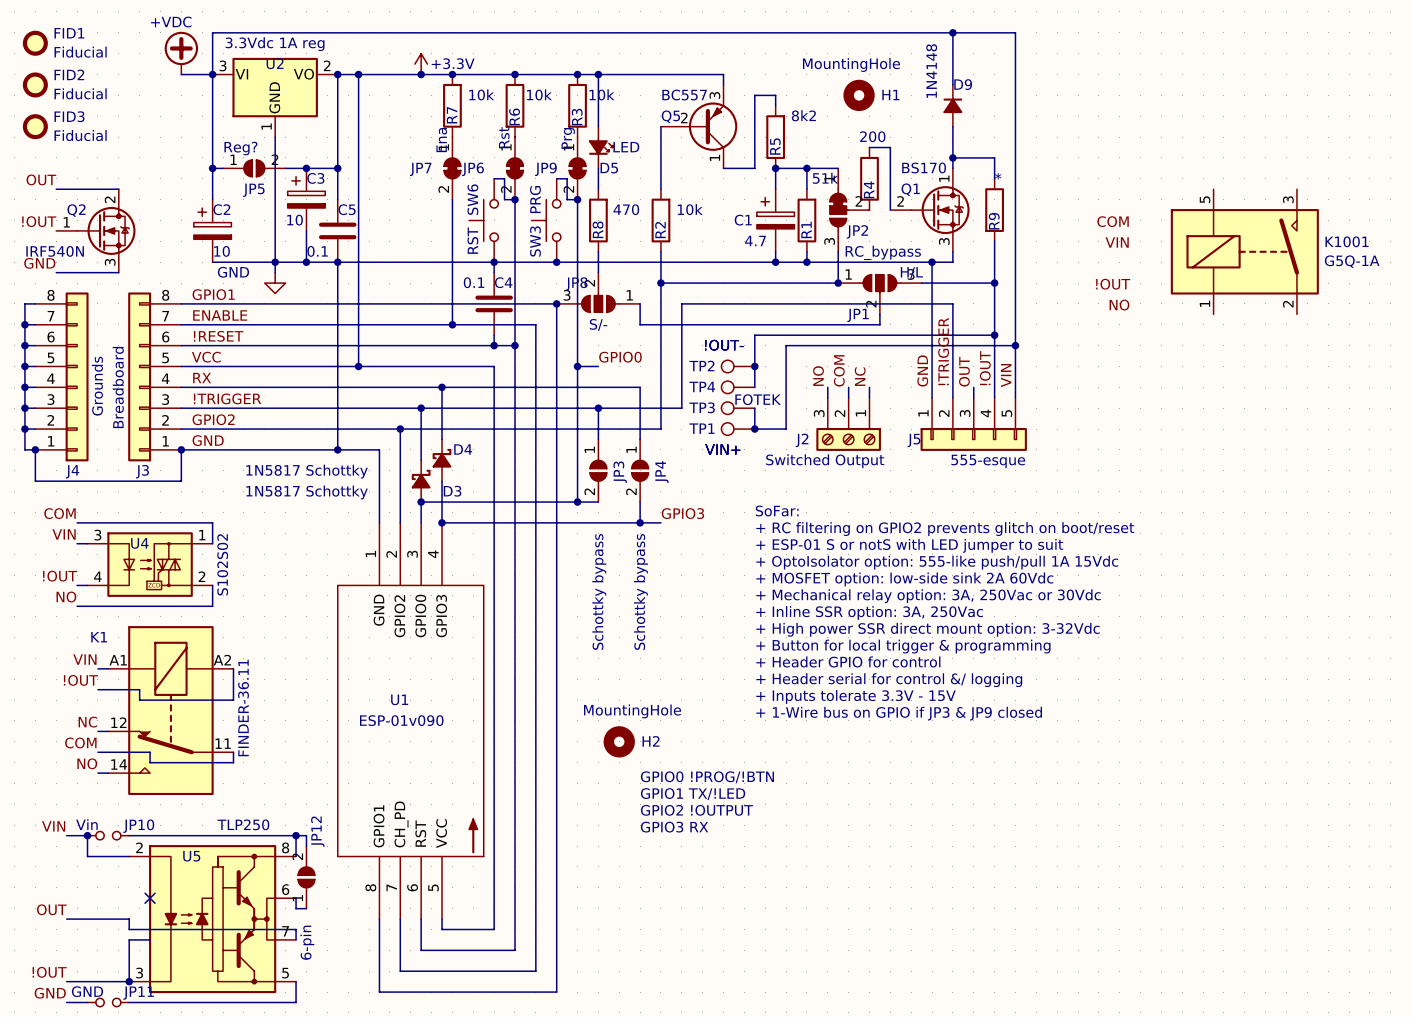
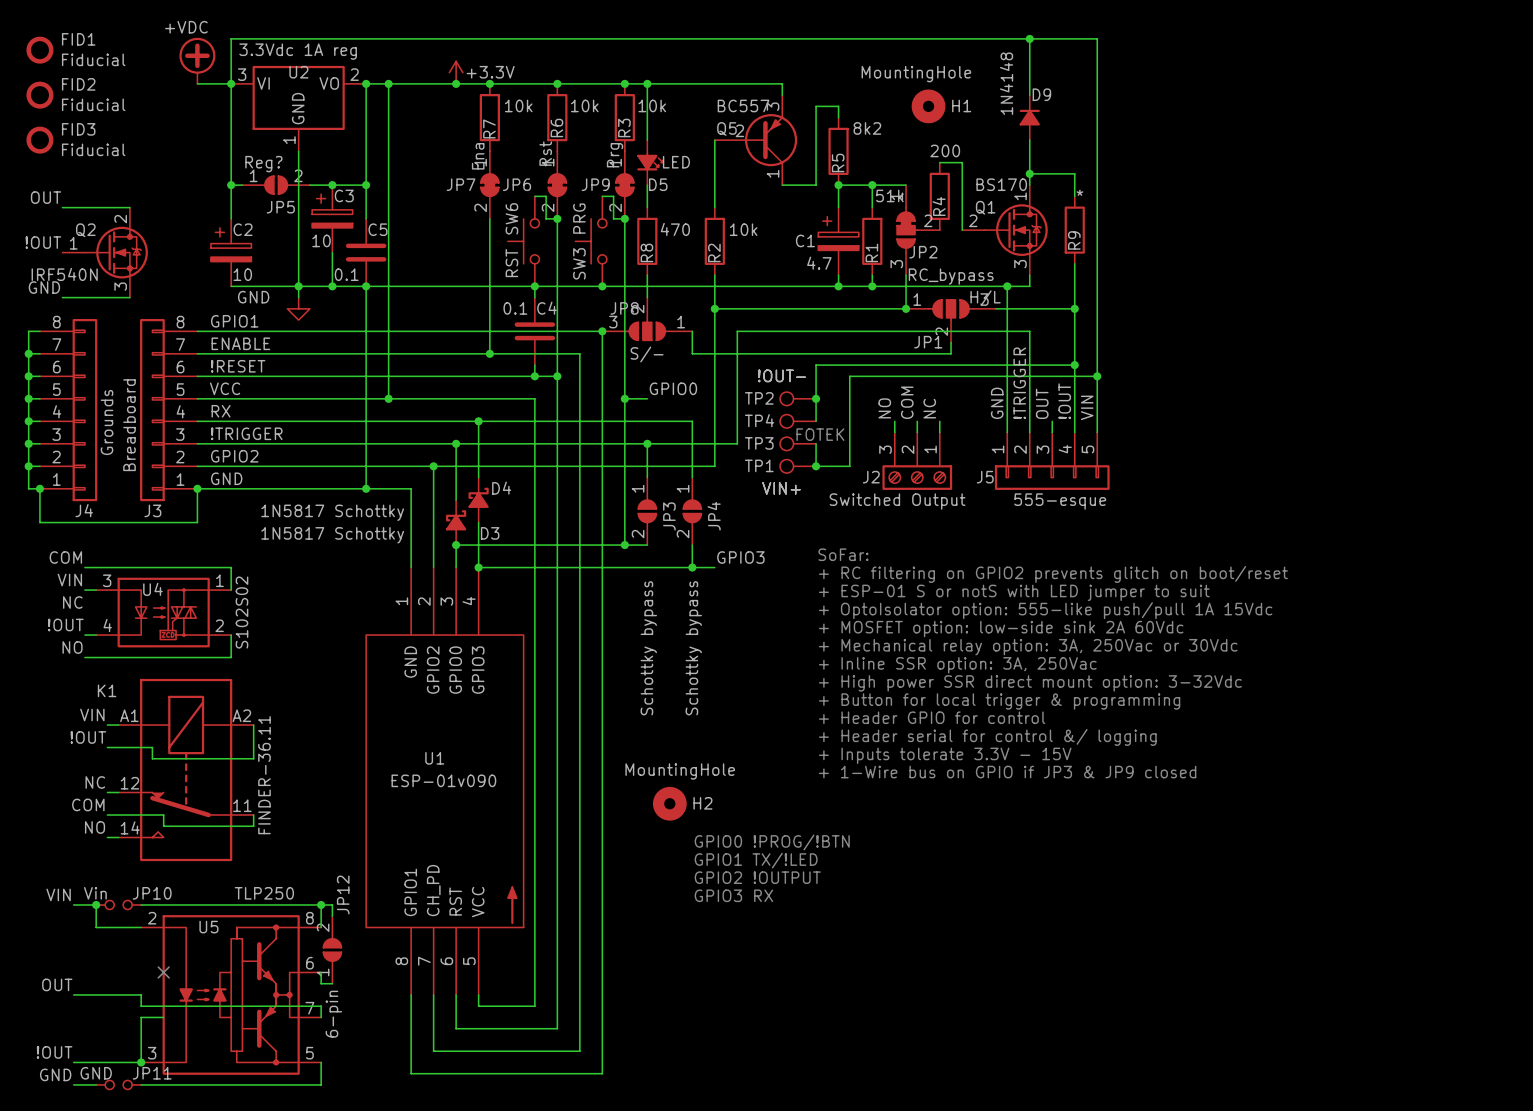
label: COM (1113, 221) -> none
label: VIN (1117, 242) -> none
K1001: G5Q-1A (1244, 251) -> none
label: !OUT (1113, 284) -> none
label: NO (1119, 305) -> none
label: none -> NC (72, 602)

